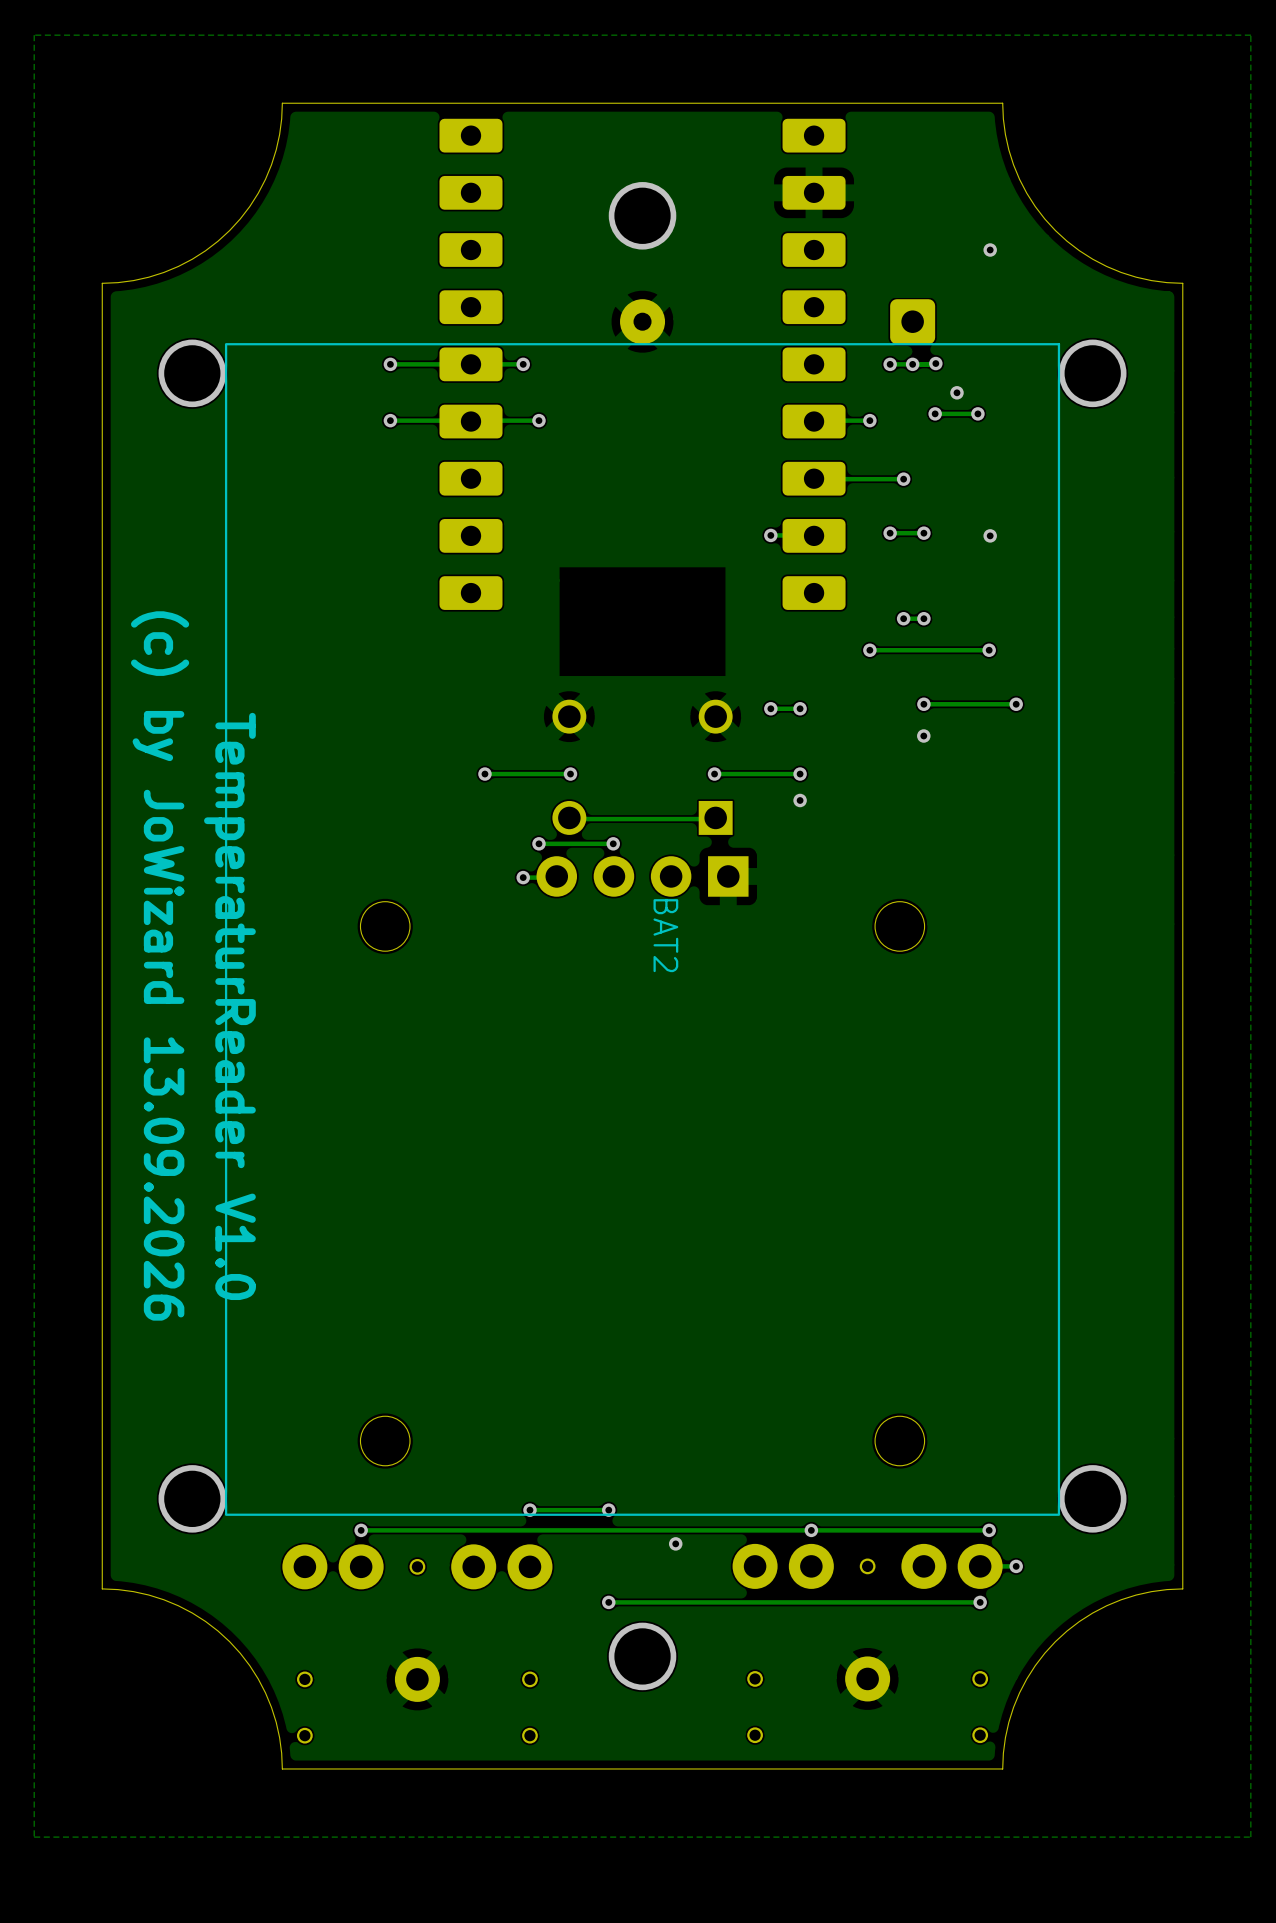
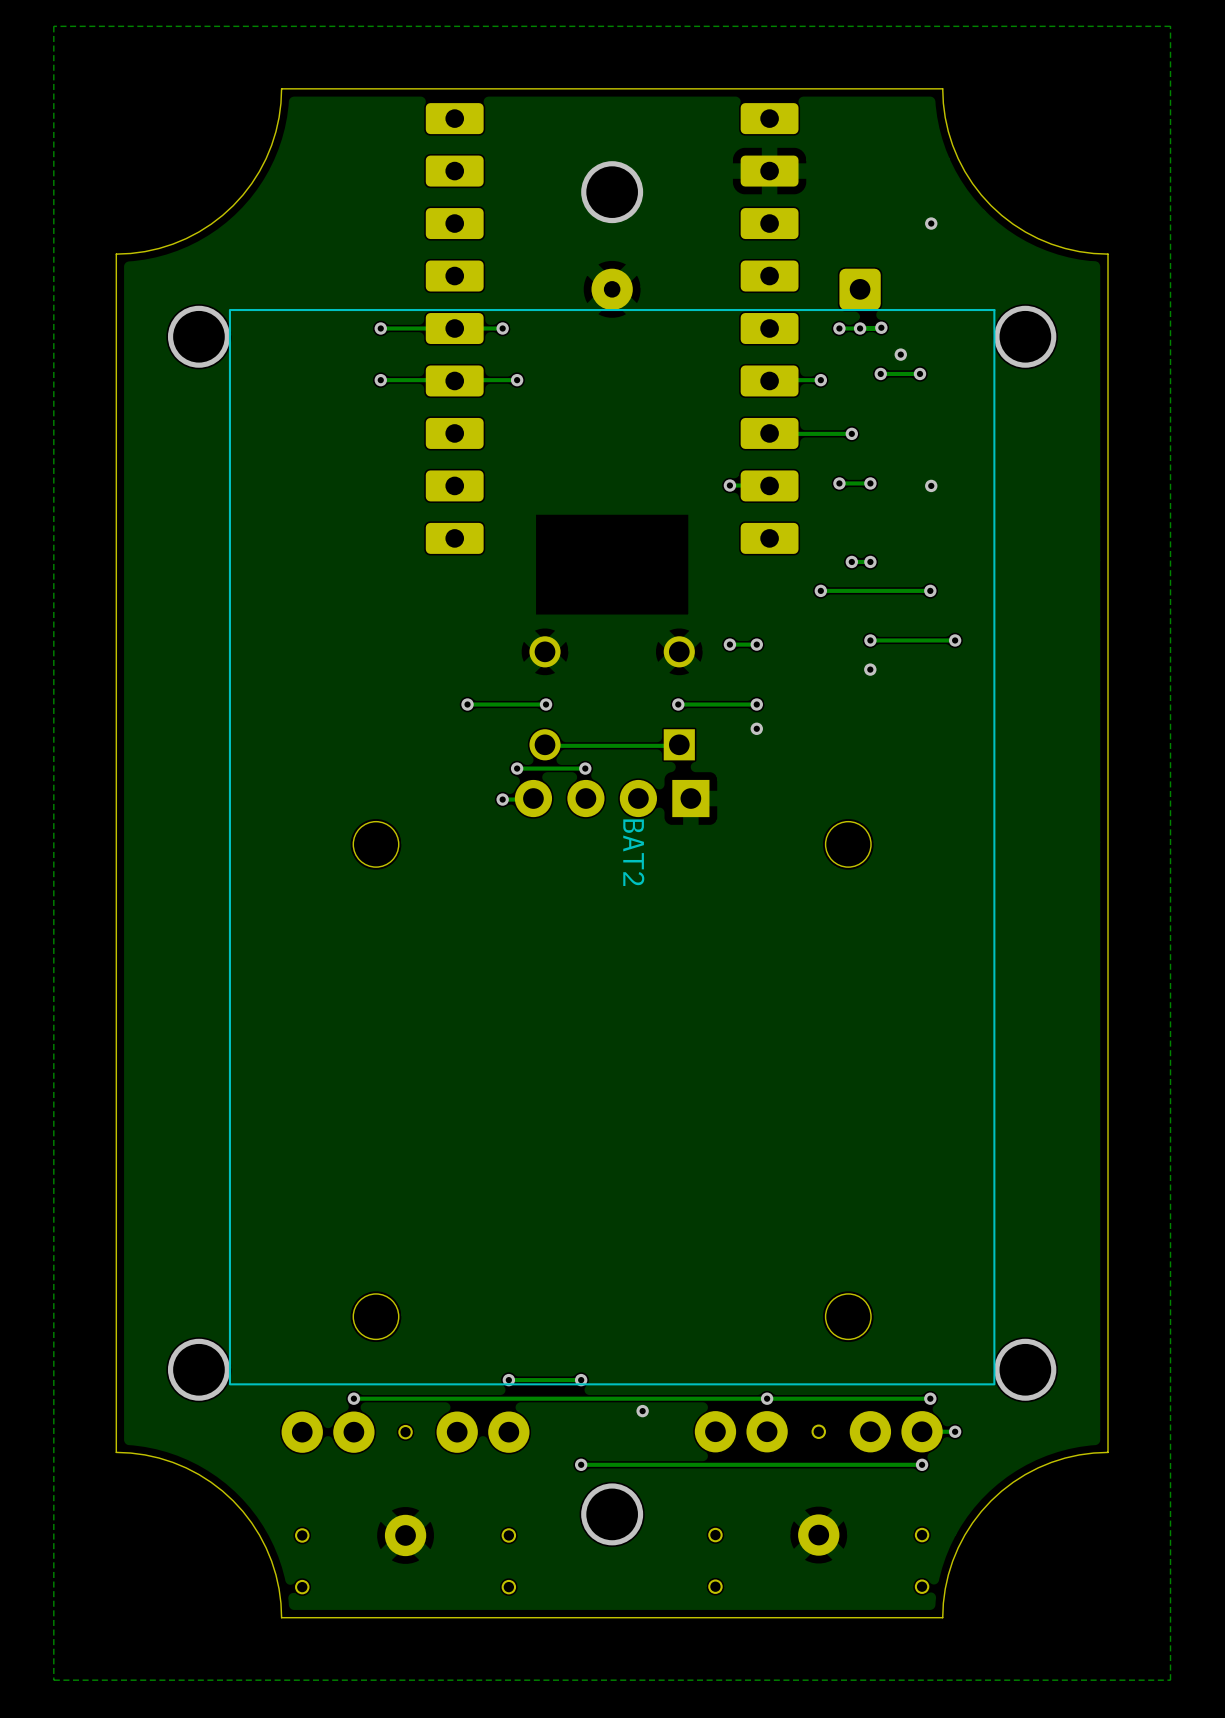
text: (c) by JoWizard 13.09.2026 (160, 965) -> none
text: TemperaturReader V1.0 (229, 1006) -> none

